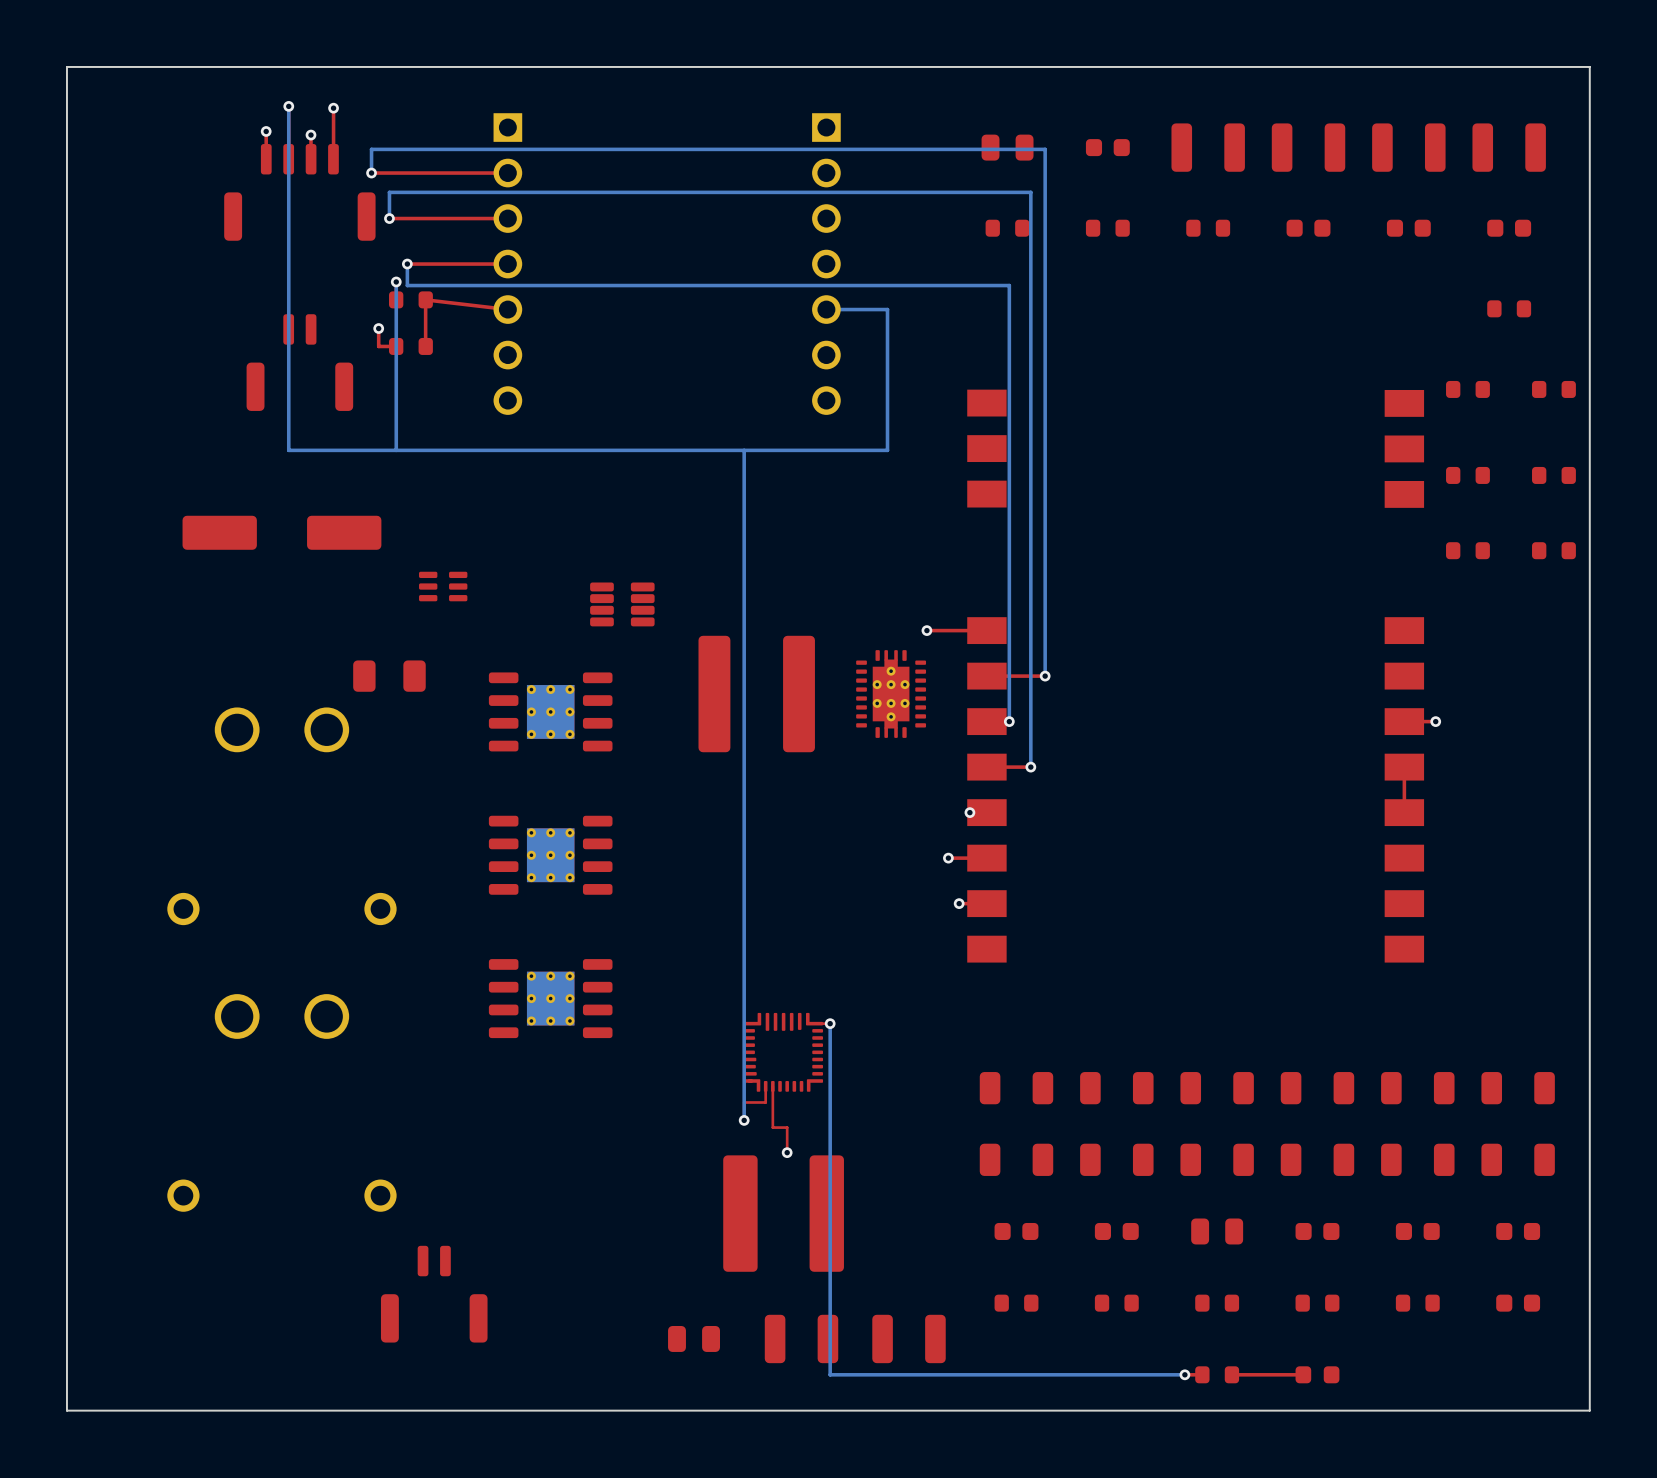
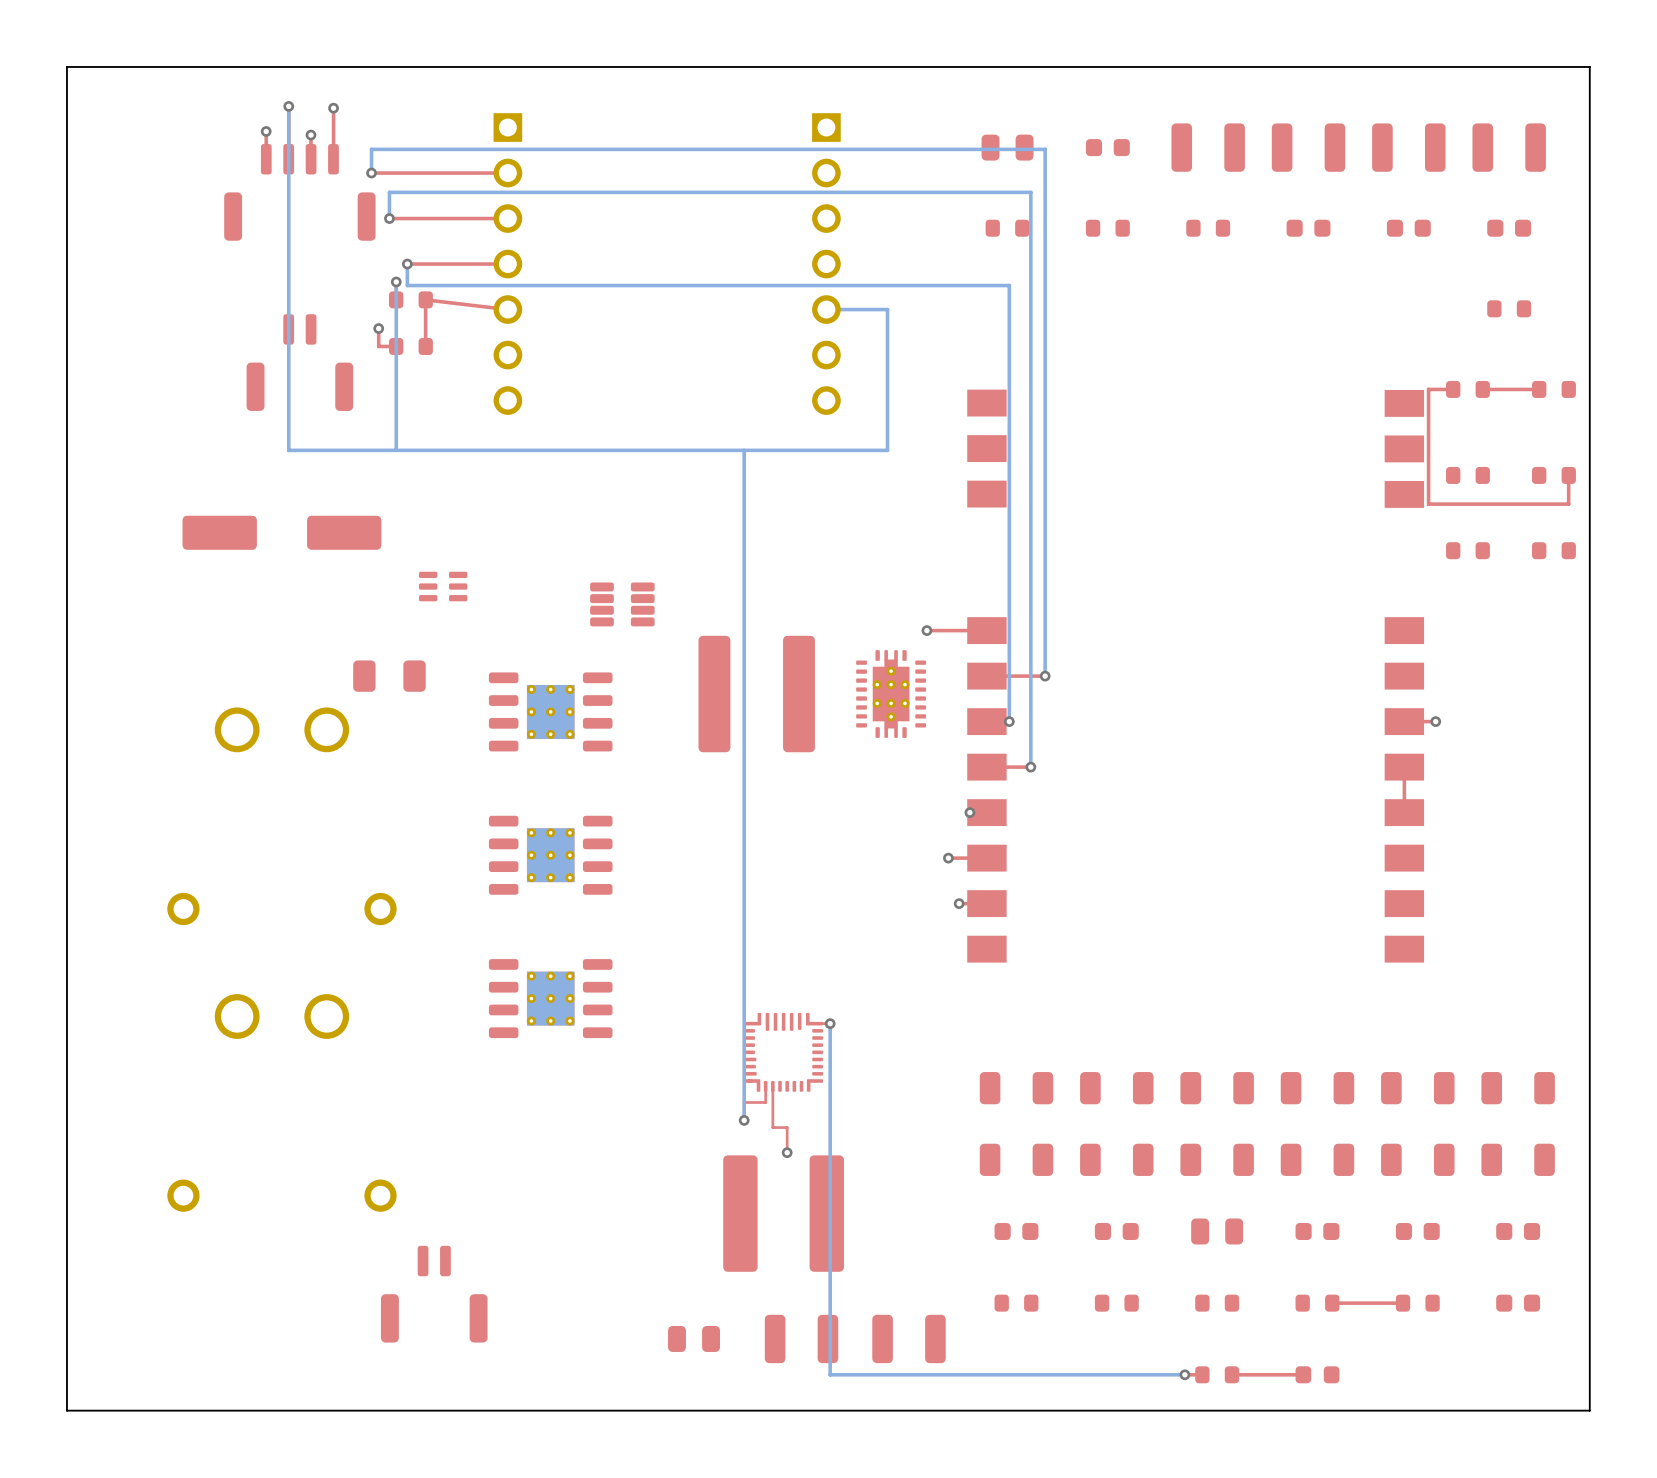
top track: none -> (1453, 389) (1428, 389) (1428, 504) (1568, 504) (1568, 475)
top track: none -> (1539, 389) (1482, 389)
top track: none -> (1402, 1303) (1332, 1303)

